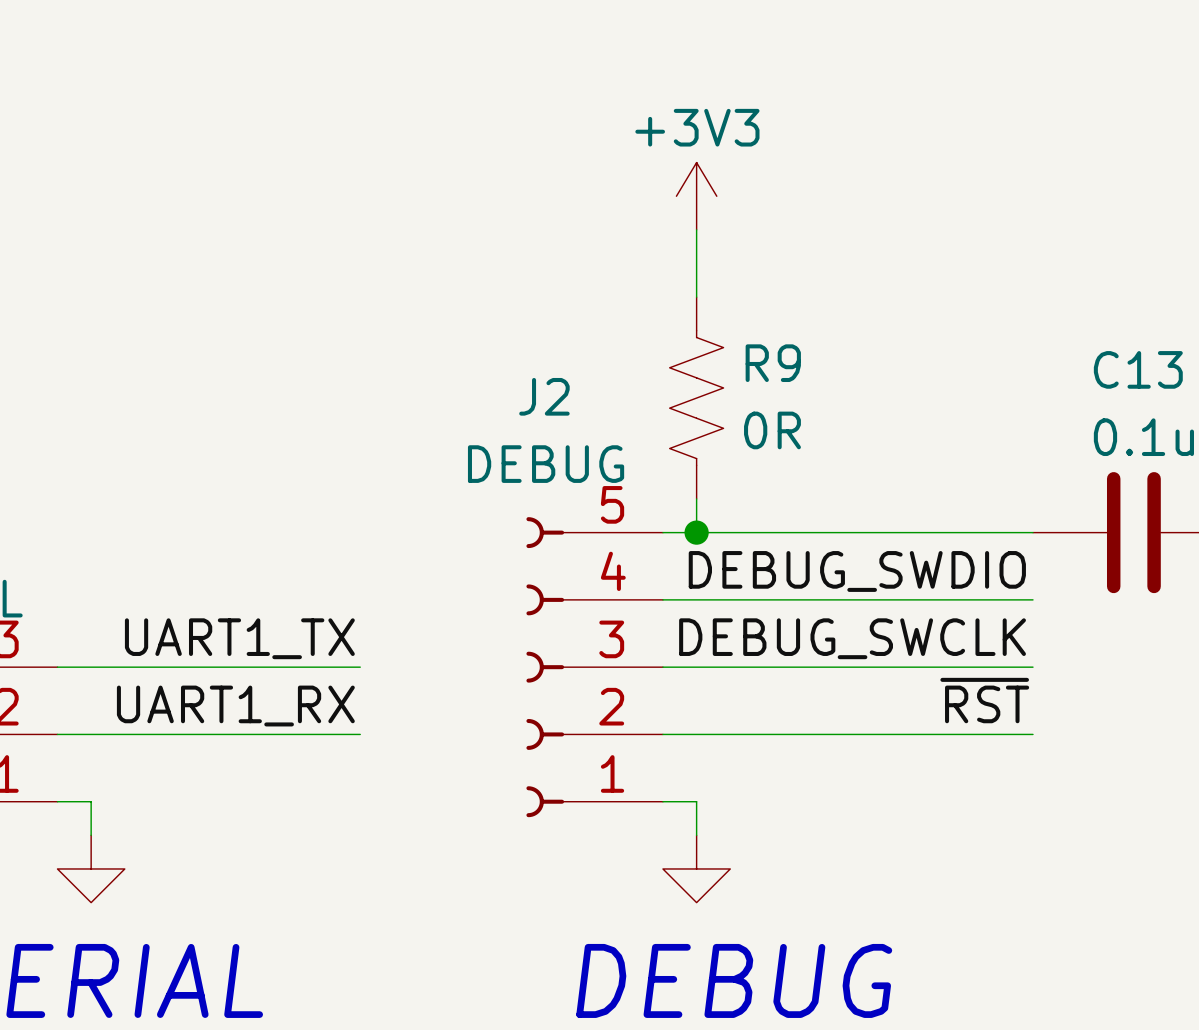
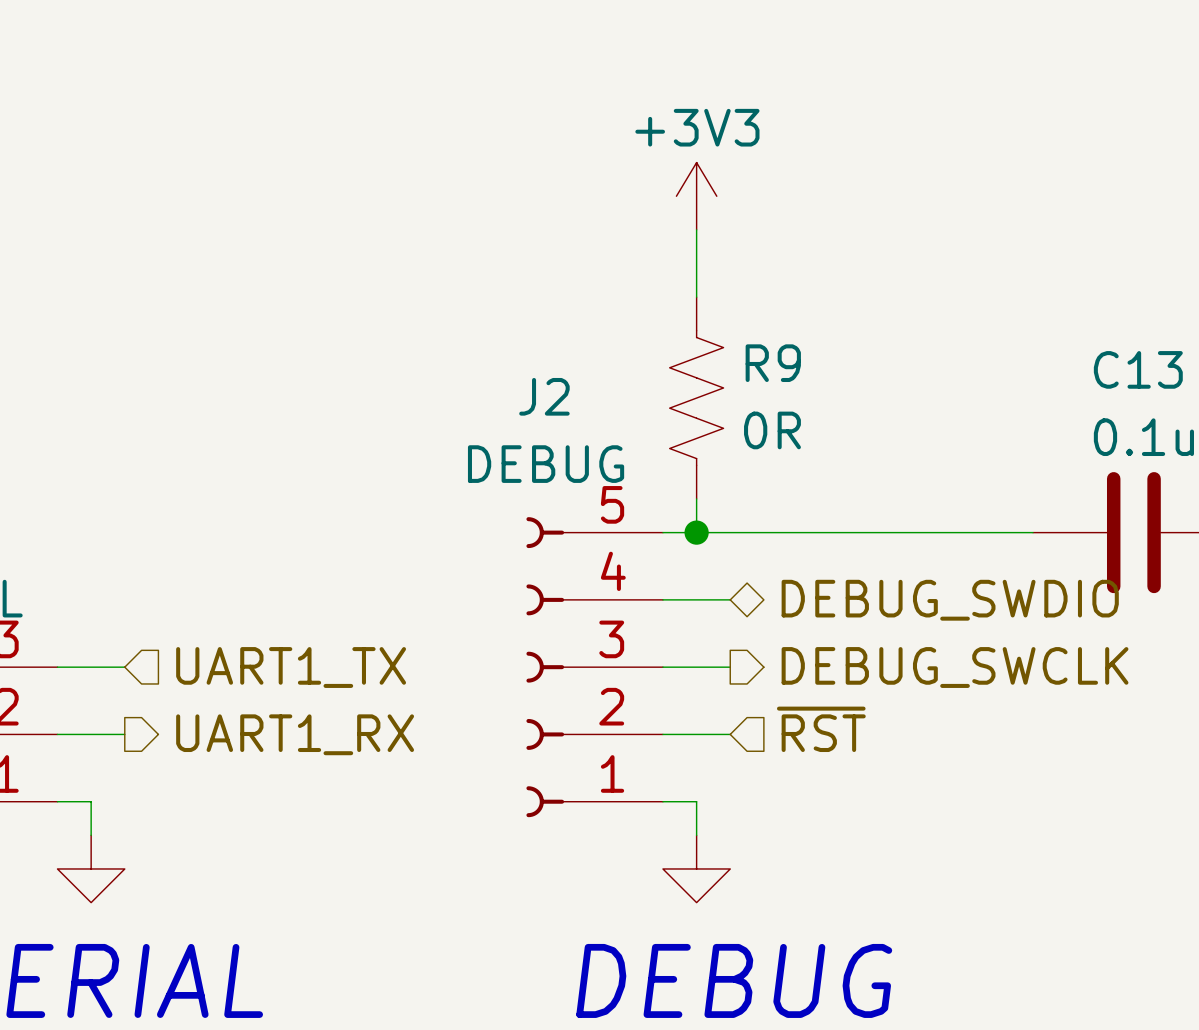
label: DEBUG_SWDIO (857, 571) -> none
wire: (730, 599) (1032, 599) -> none
hierarchical label: none -> DEBUG_SWDIO (950, 600)
label: UART1_TX (239, 638) -> none
label: DEBUG_SWCLK (852, 638) -> none
wire: (124, 667) (360, 667) -> none
hierarchical label: none -> UART1_TX (291, 667)
wire: (730, 667) (1032, 667) -> none
hierarchical label: none -> DEBUG_SWCLK (955, 667)
label: ~{RST} (984, 700) -> none
label: UART1_RX (235, 706) -> none
hierarchical label: none -> ~{RST} (821, 729)
wire: (124, 734) (360, 734) -> none
hierarchical label: none -> UART1_RX (295, 734)
wire: (730, 734) (1032, 734) -> none

